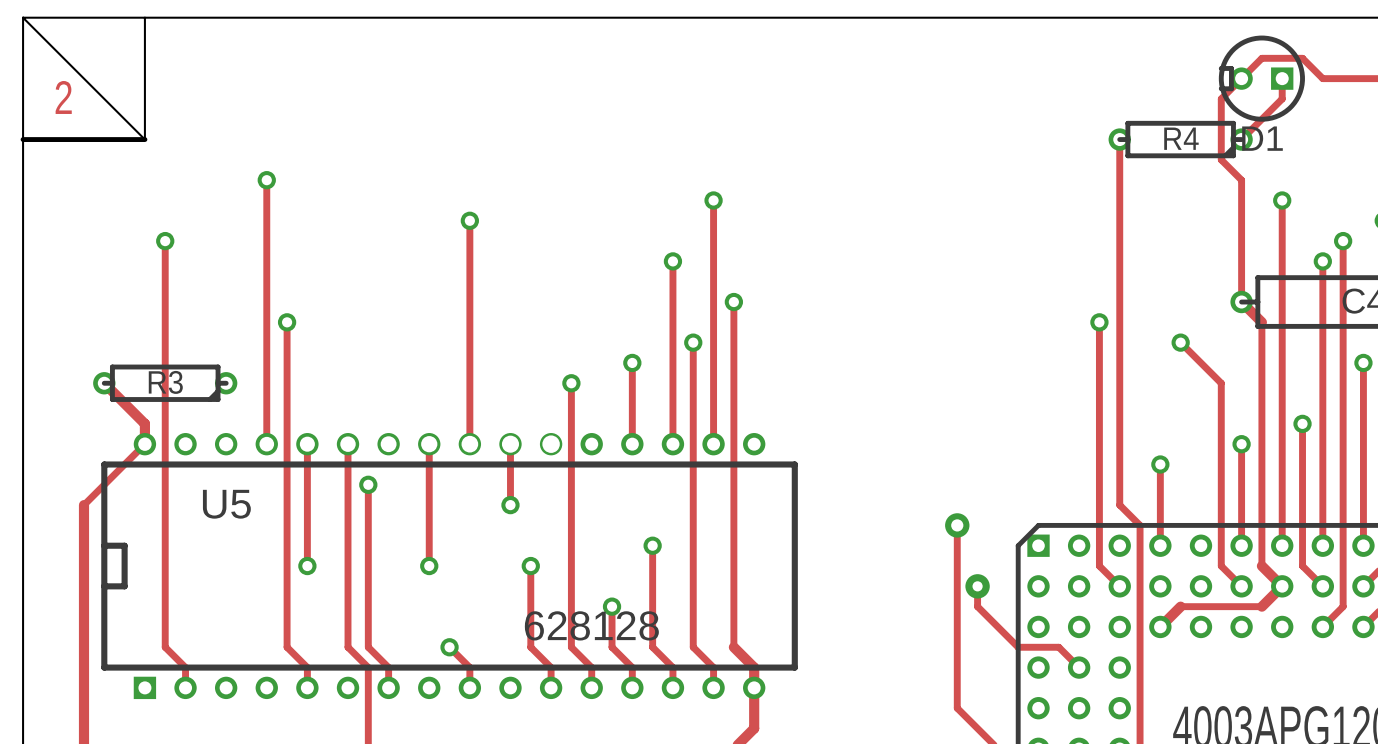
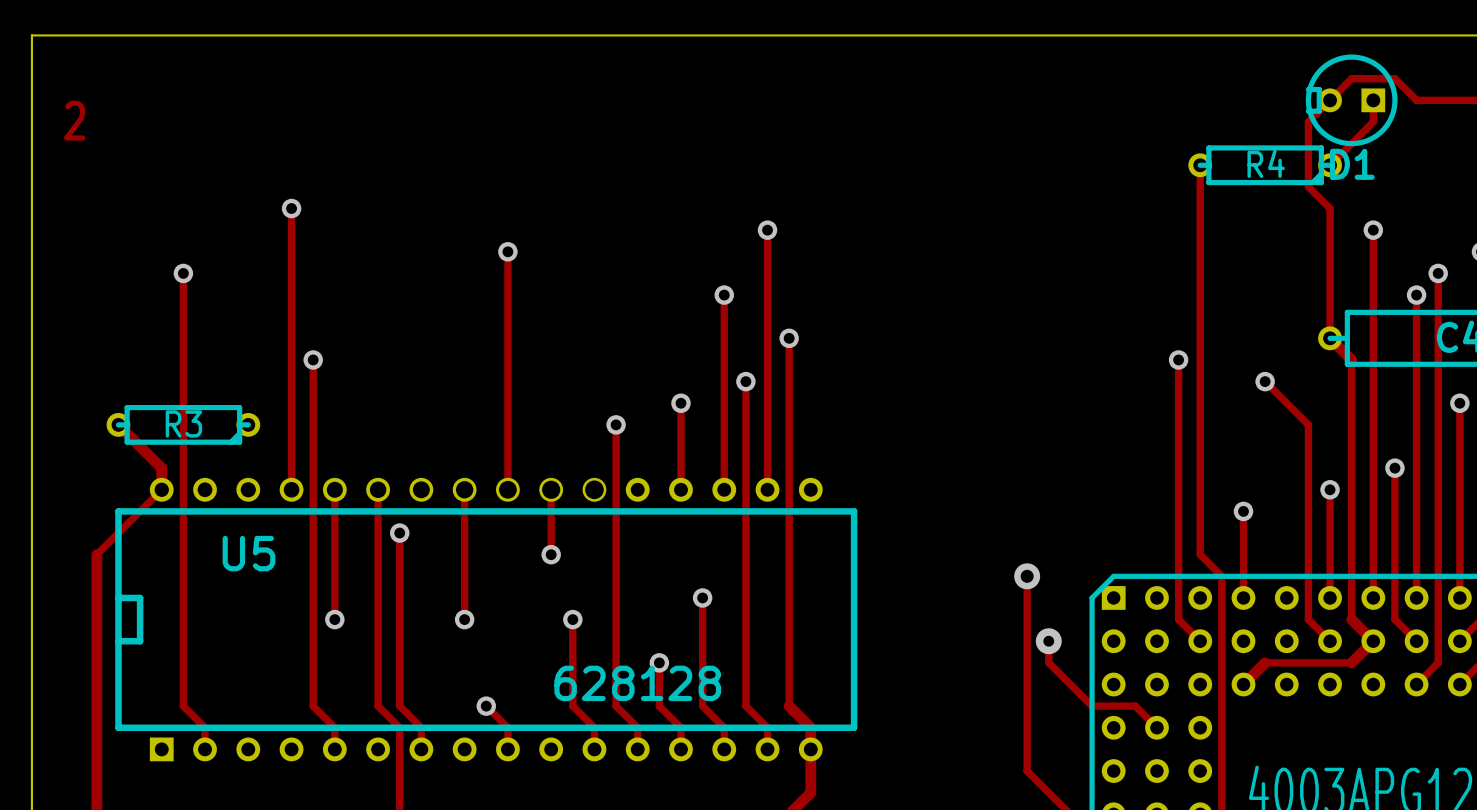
board edge: (23, 17) (144, 139) -> none
board edge: (144, 17) (144, 139) -> none
board edge: (23, 139) (144, 139) -> none

